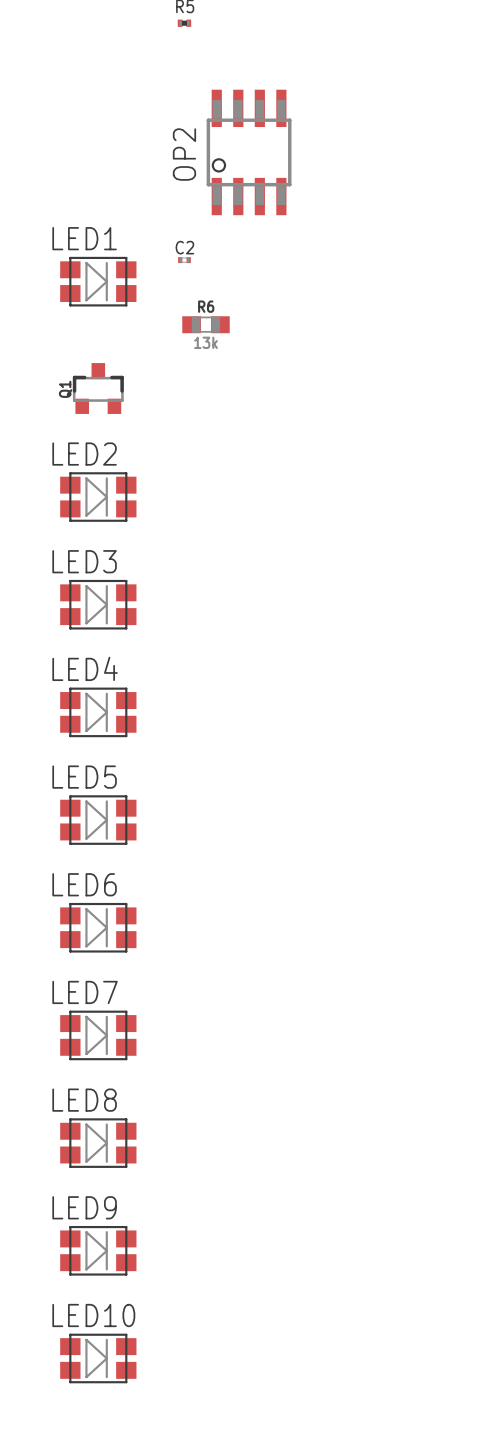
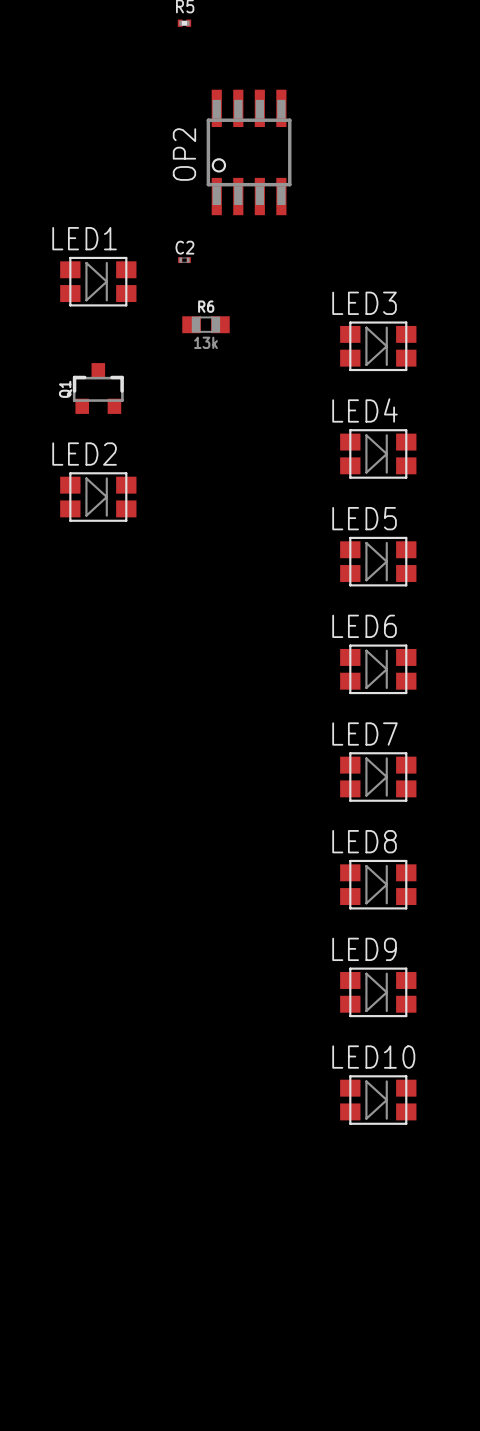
LED3 position: (98, 604) -> (378, 346)
LED4 position: (98, 712) -> (378, 453)
LED5 position: (98, 820) -> (378, 561)
LED6 position: (98, 927) -> (378, 669)
LED7 position: (98, 1035) -> (378, 777)
LED8 position: (98, 1143) -> (378, 884)
LED9 position: (98, 1250) -> (378, 992)
LED10 position: (98, 1358) -> (378, 1100)

